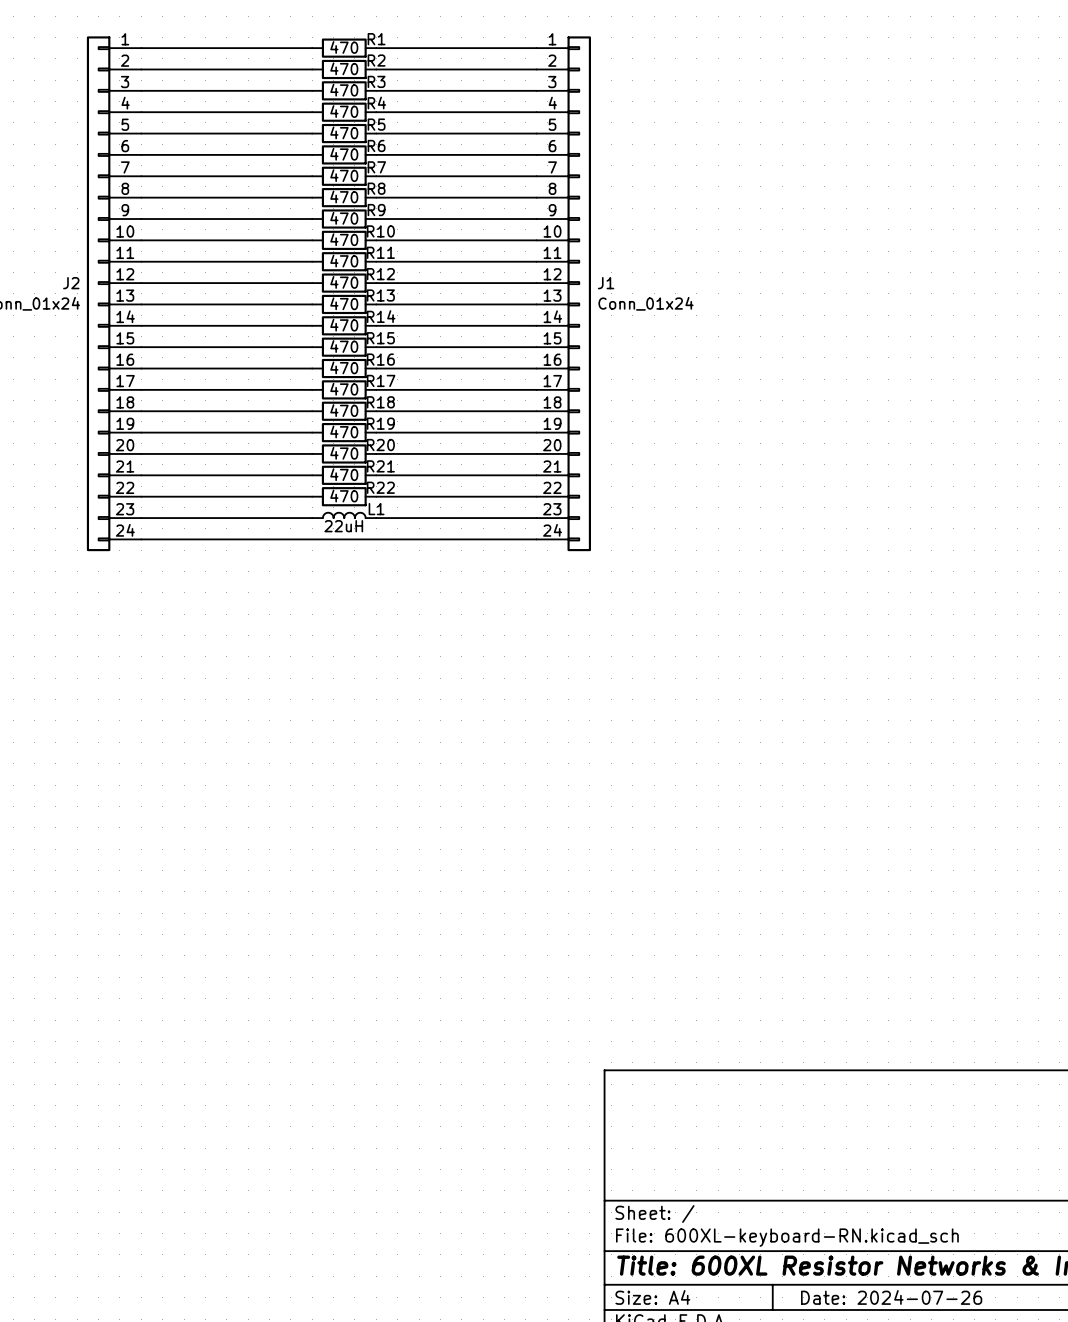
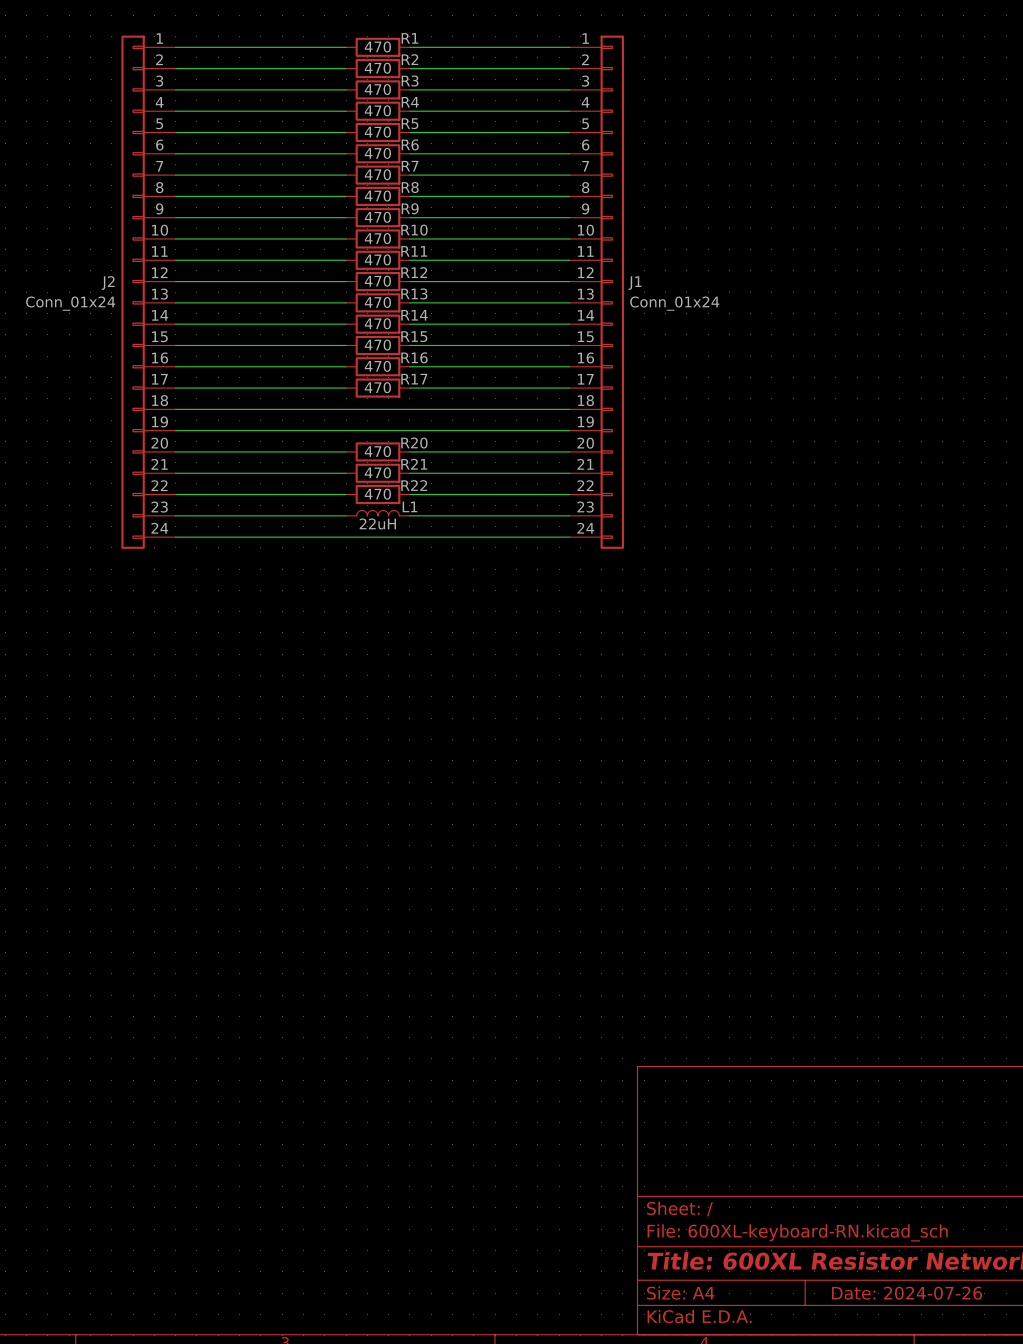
wire: none -> (346, 409) (409, 409)
R18: 470 (344, 411) -> none
wire: none -> (346, 430) (409, 430)
R19: 470 (344, 432) -> none

